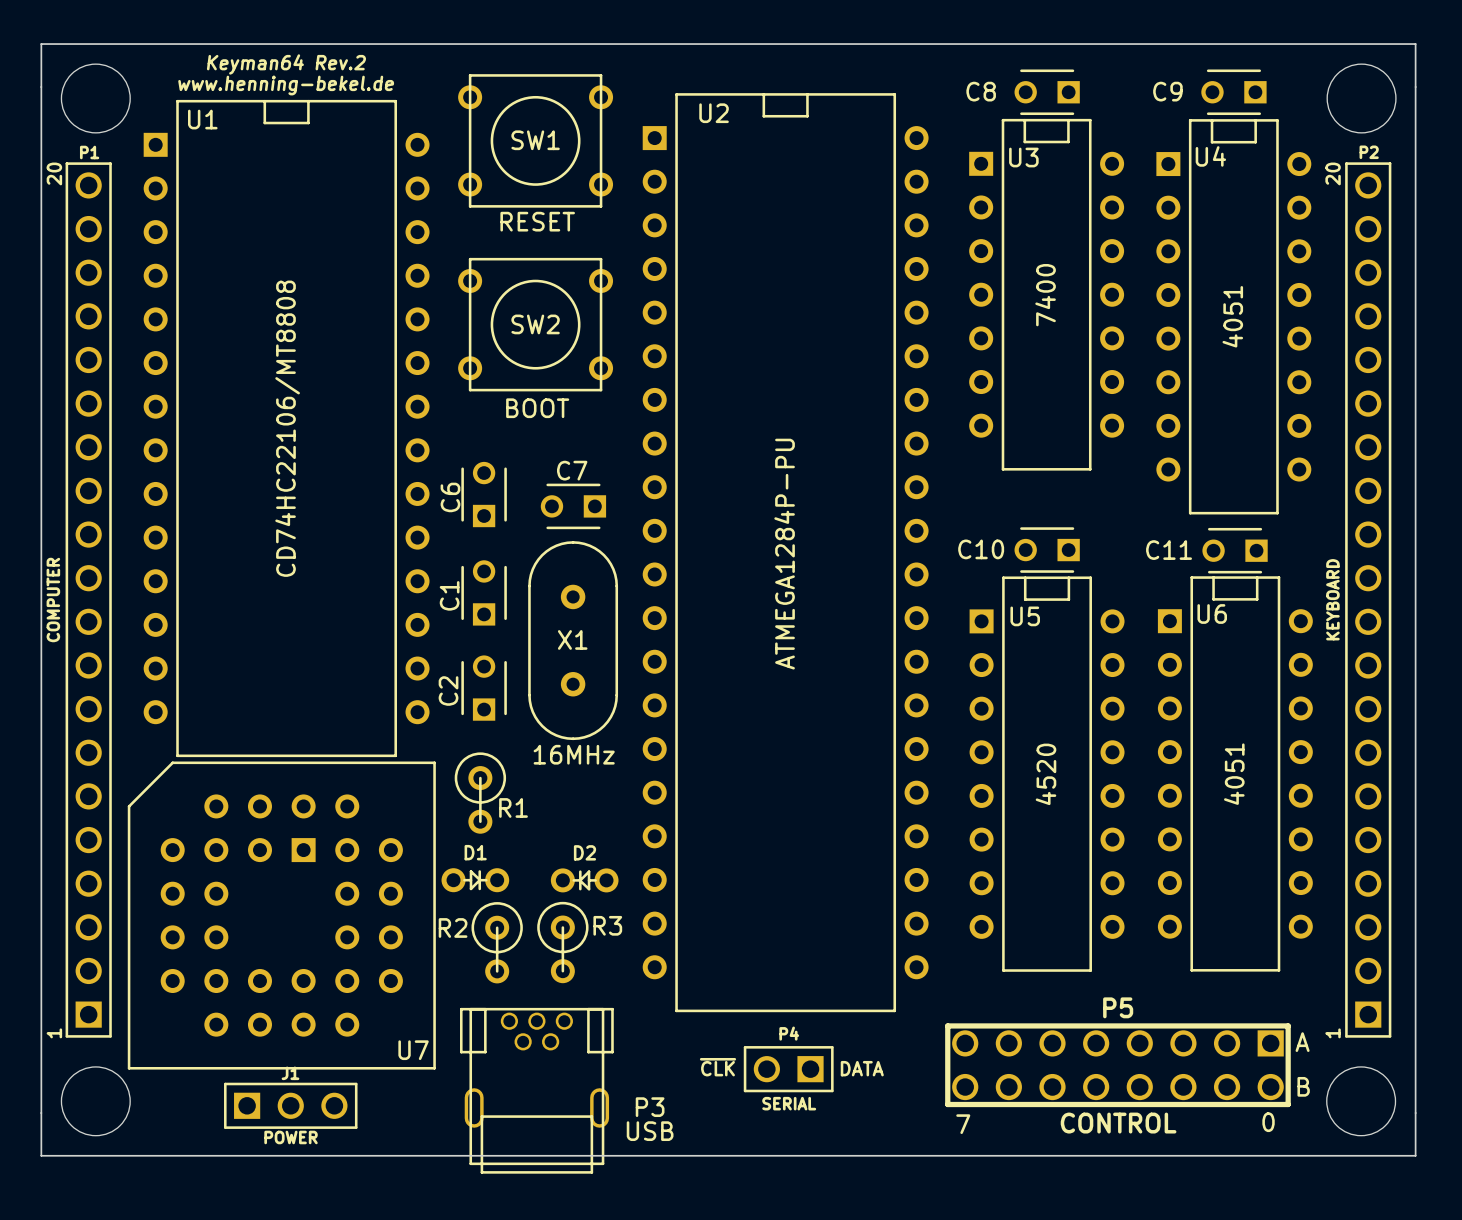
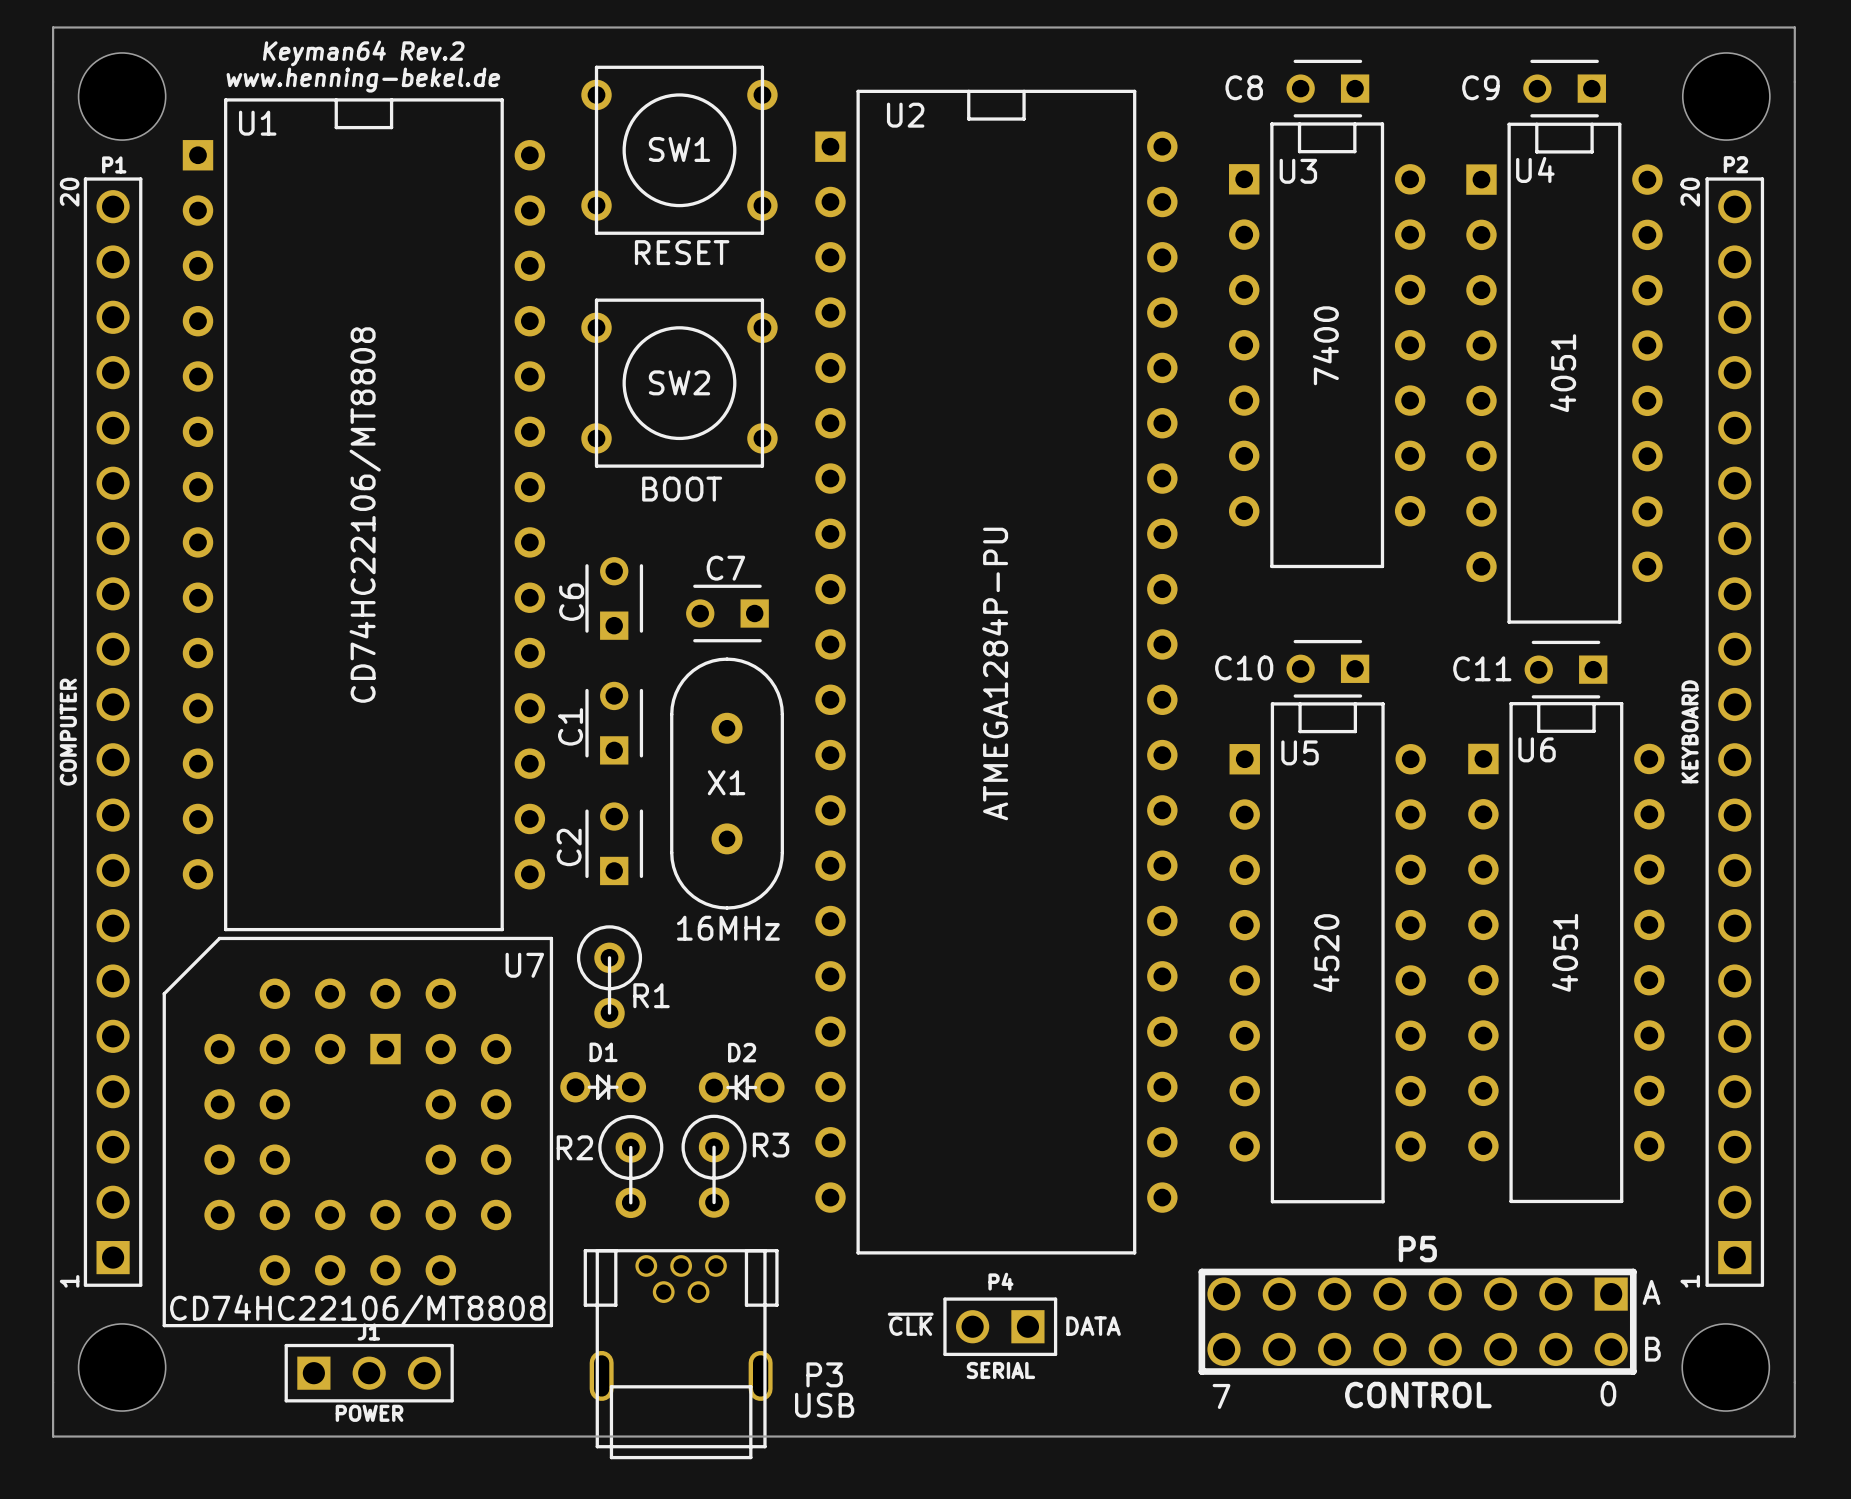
U7 name position: U7 (413, 1050) -> U7 (524, 965)
U7 value: none -> CD74HC22106/MT8808 (357, 1310)

